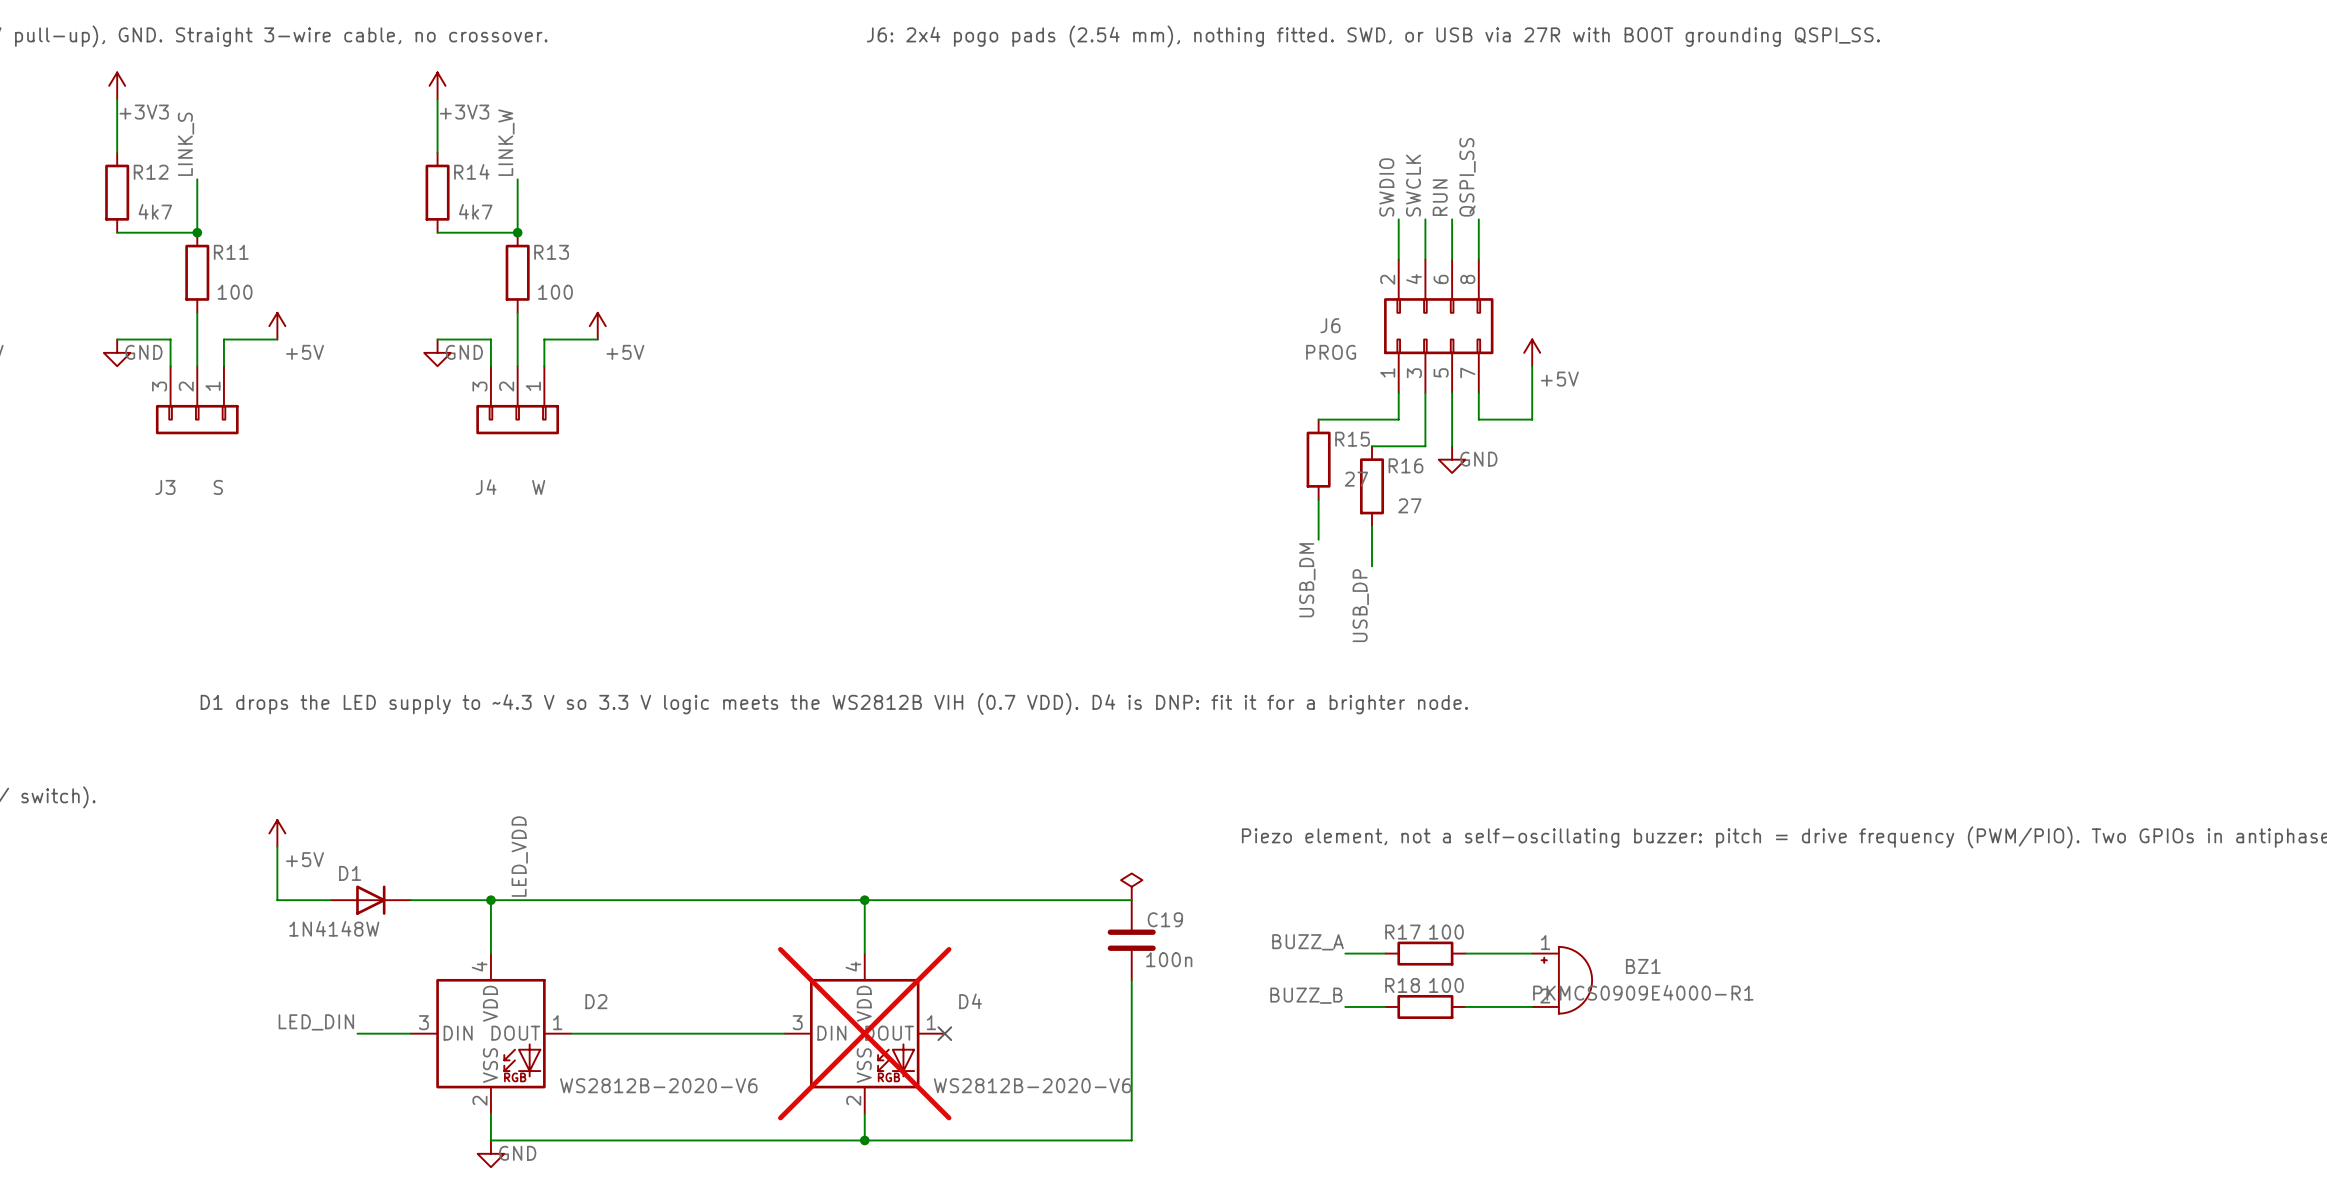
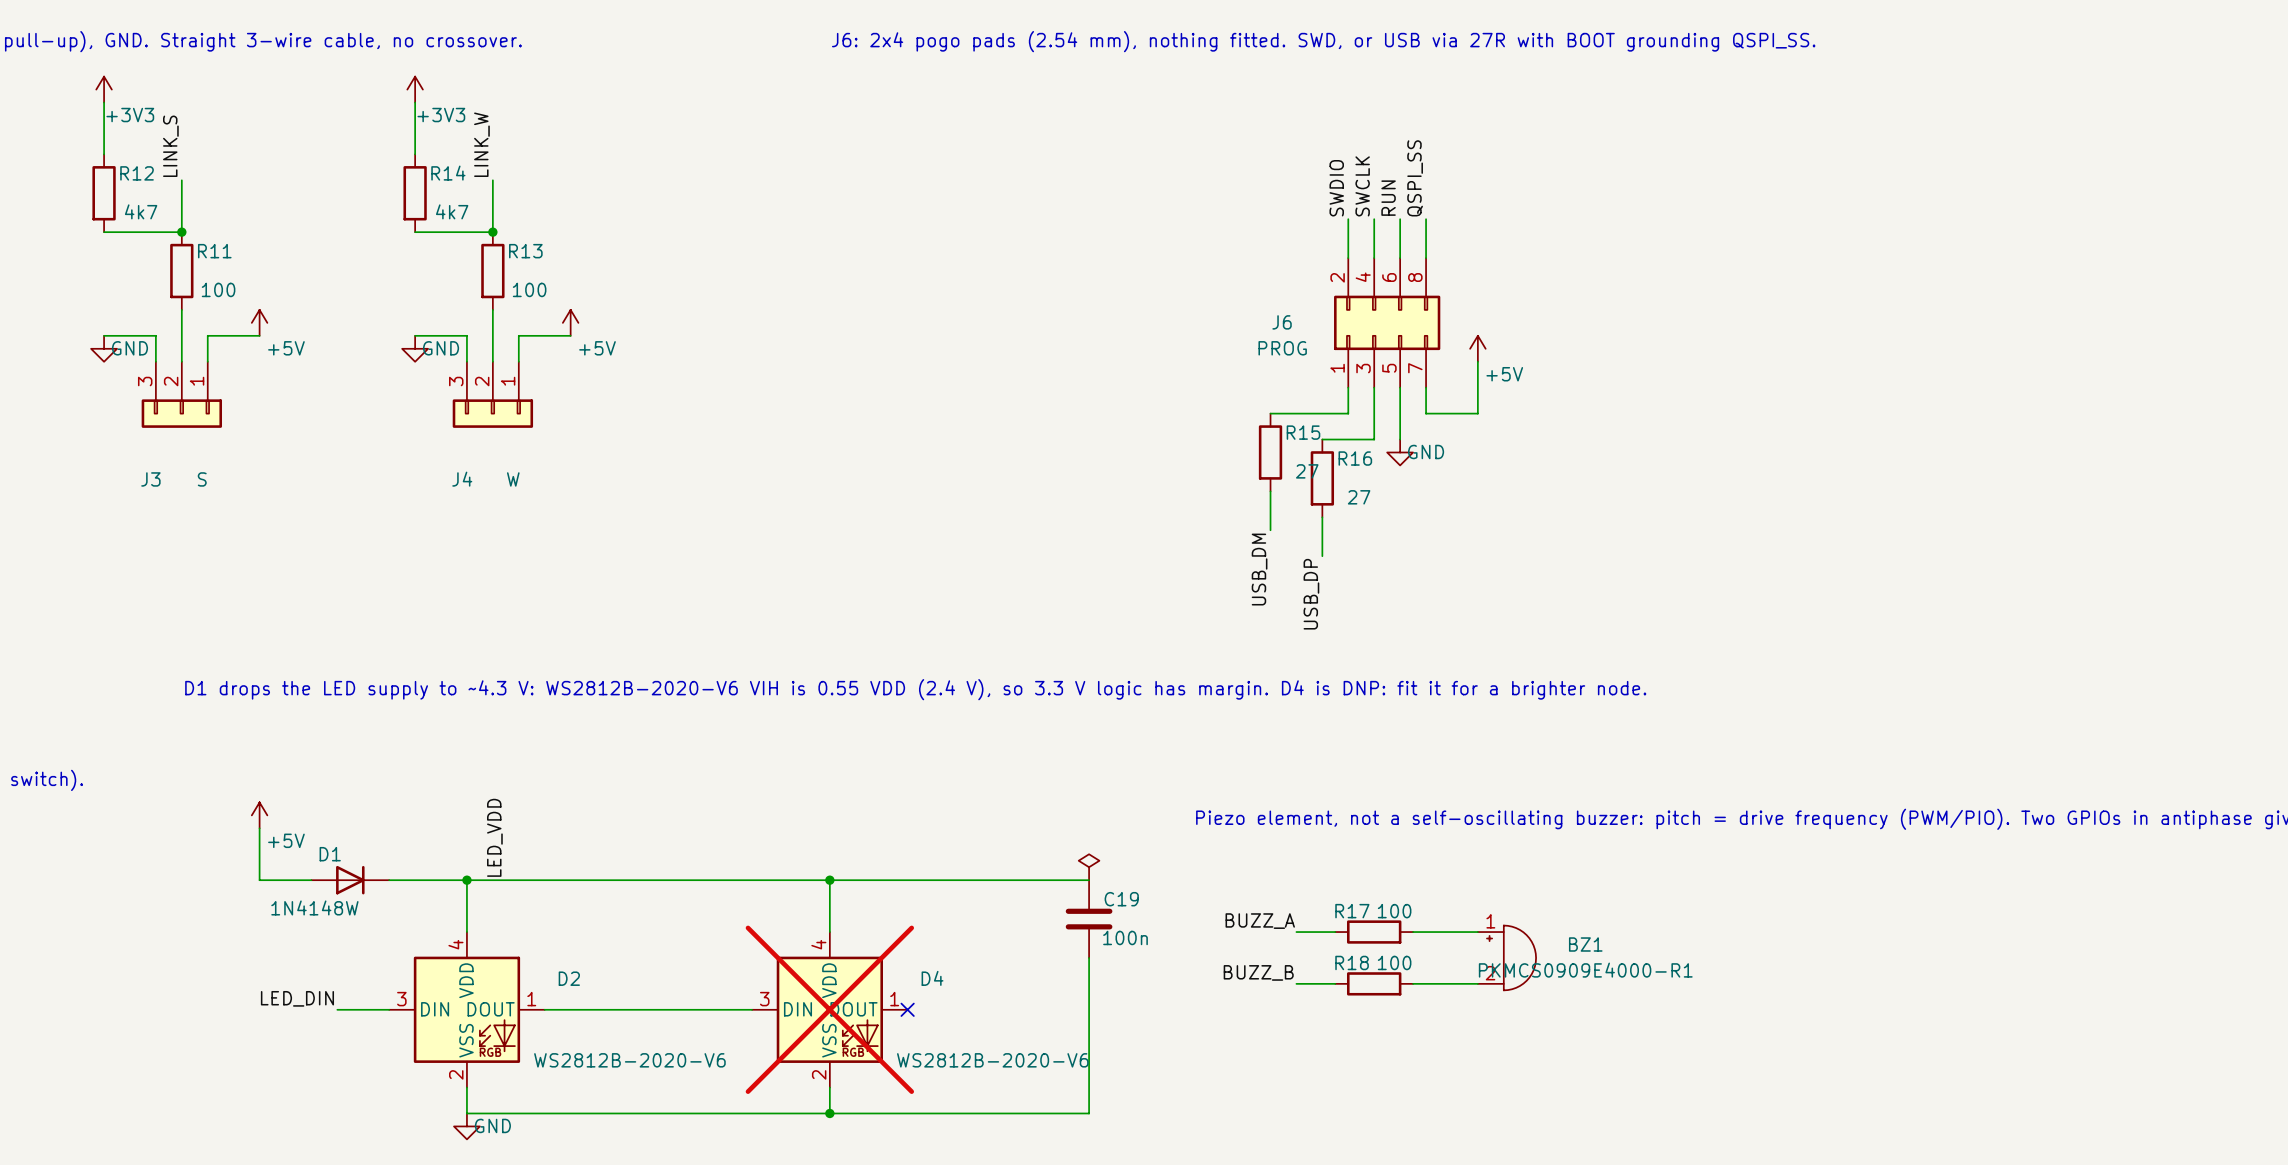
text: D1 drops the LED supply to ~4.3 V so 3.3 V logic meets the WS2812B VIH (0.7 VDD). D4 is DNP: fit it for a brighter node. (834, 703) -> D1 drops the LED supply to ~4.3 V: WS2812B-2020-V6 VIH is 0.55 VDD (2.4 V), so 3.3 V logic has margin. D4 is DNP: fit it for a brighter node. (915, 689)

